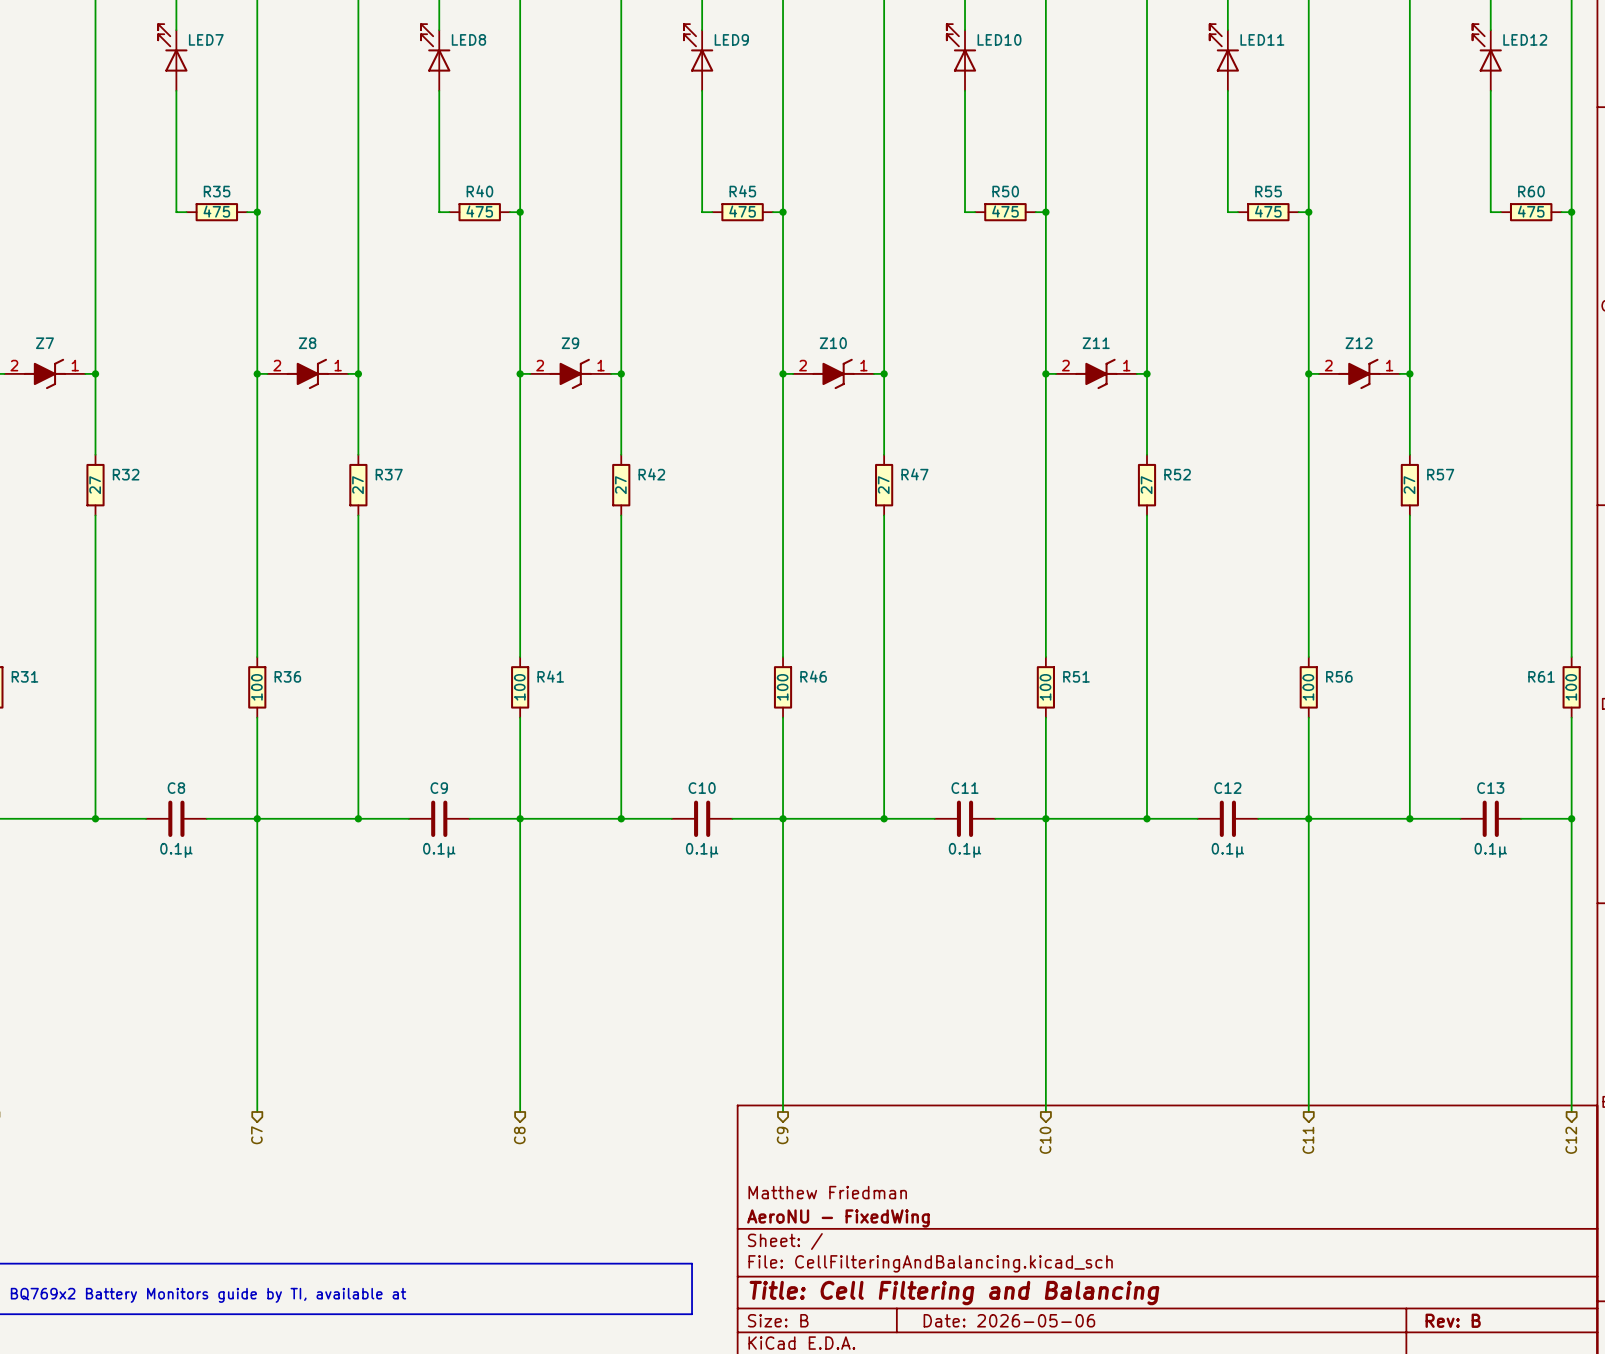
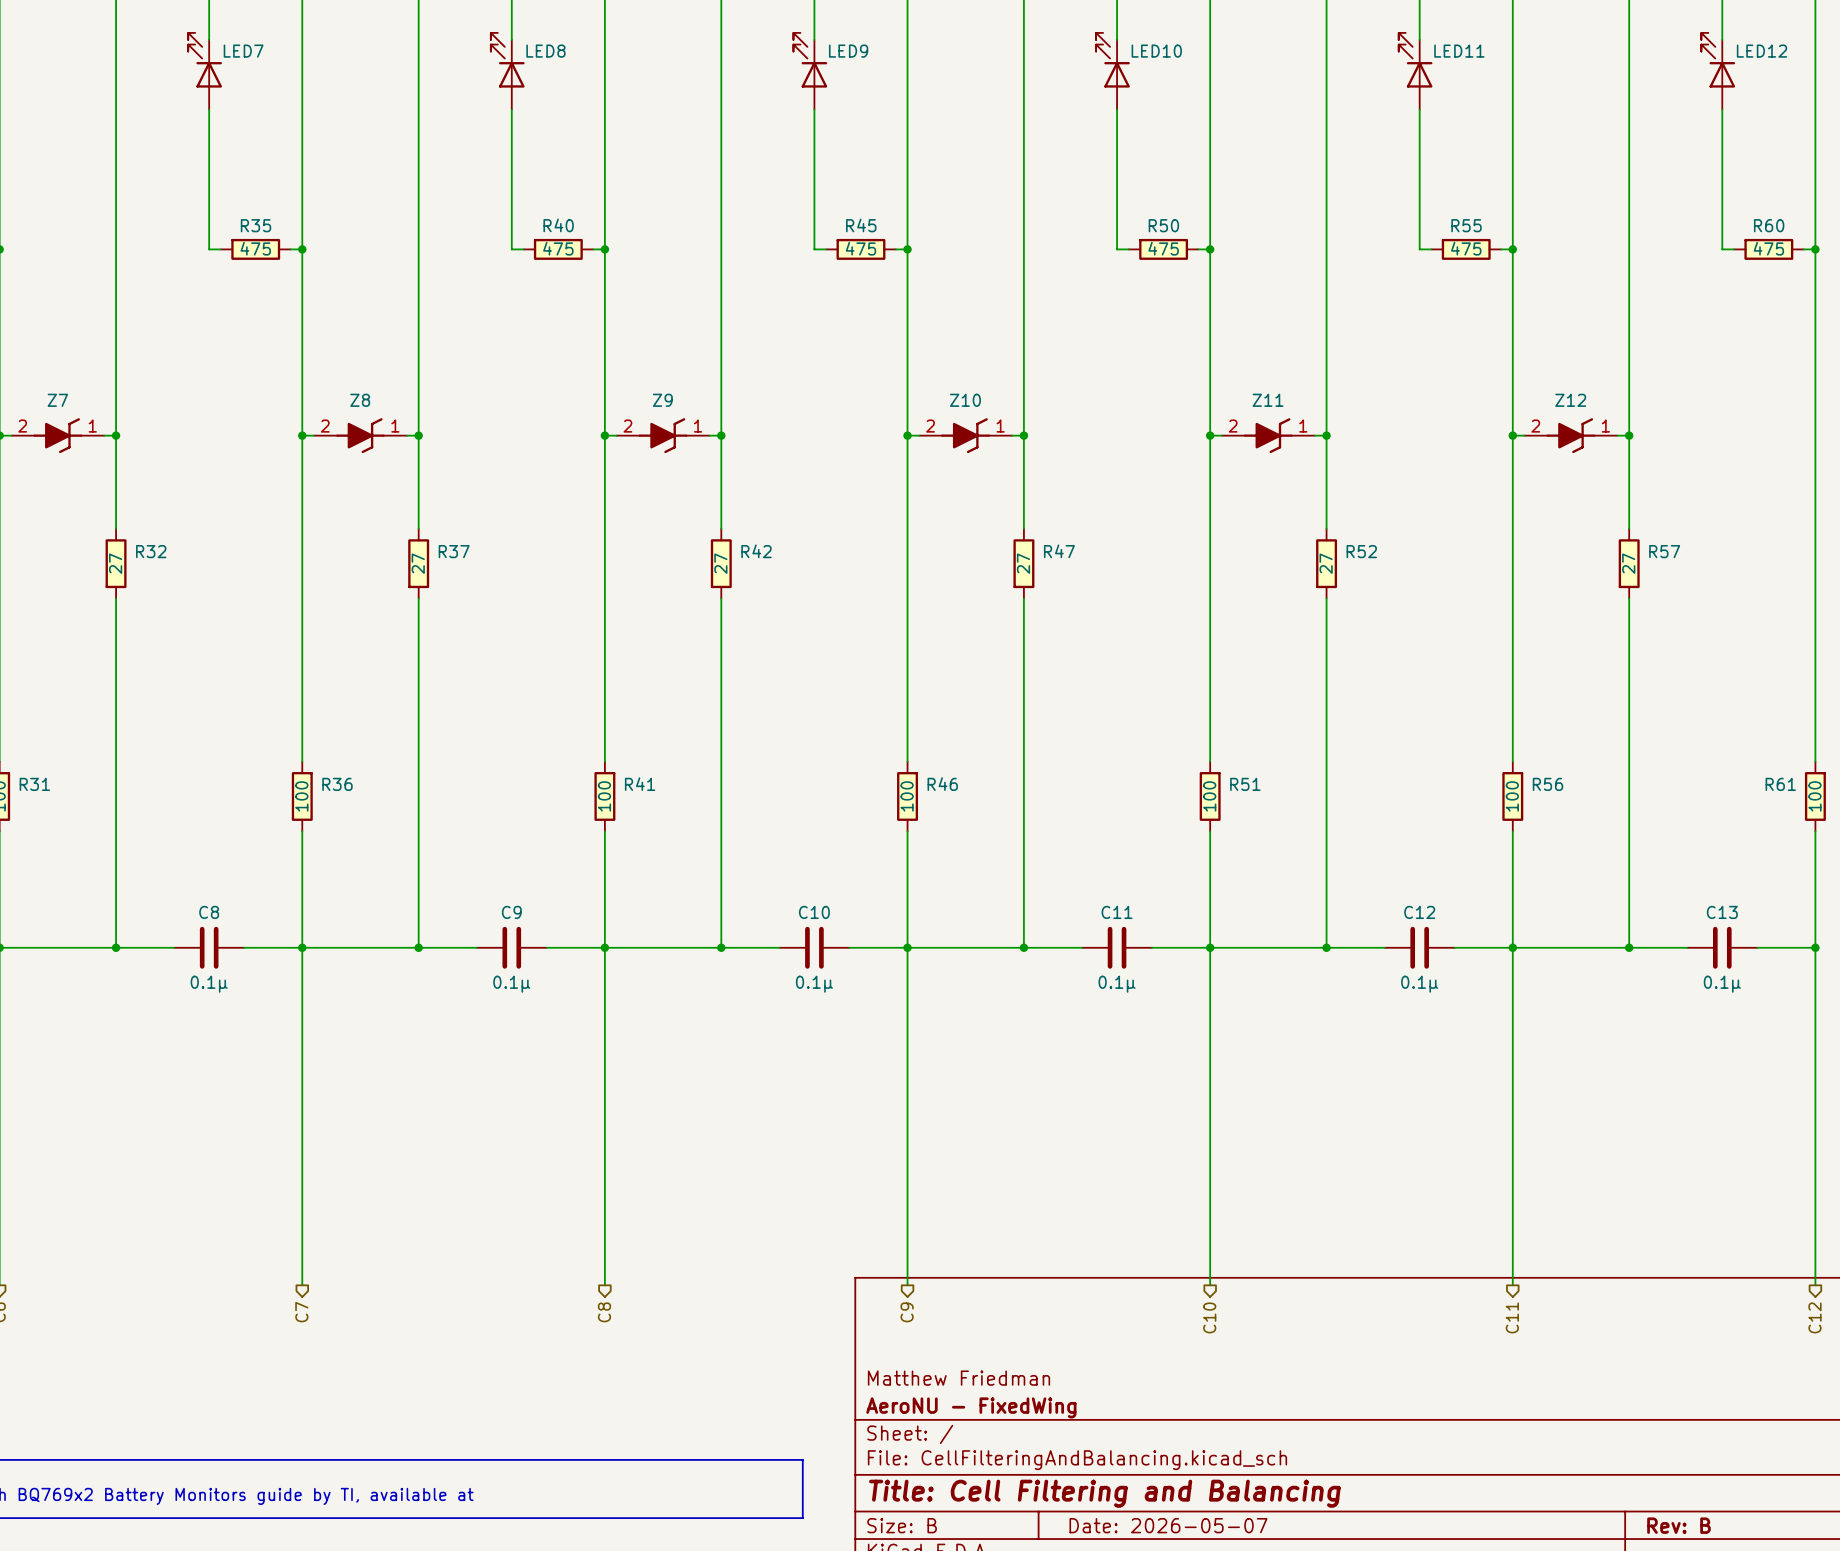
title block: Date: 2026-05-06 (1009, 1320) -> Date: 2026-05-07 (1168, 1525)

